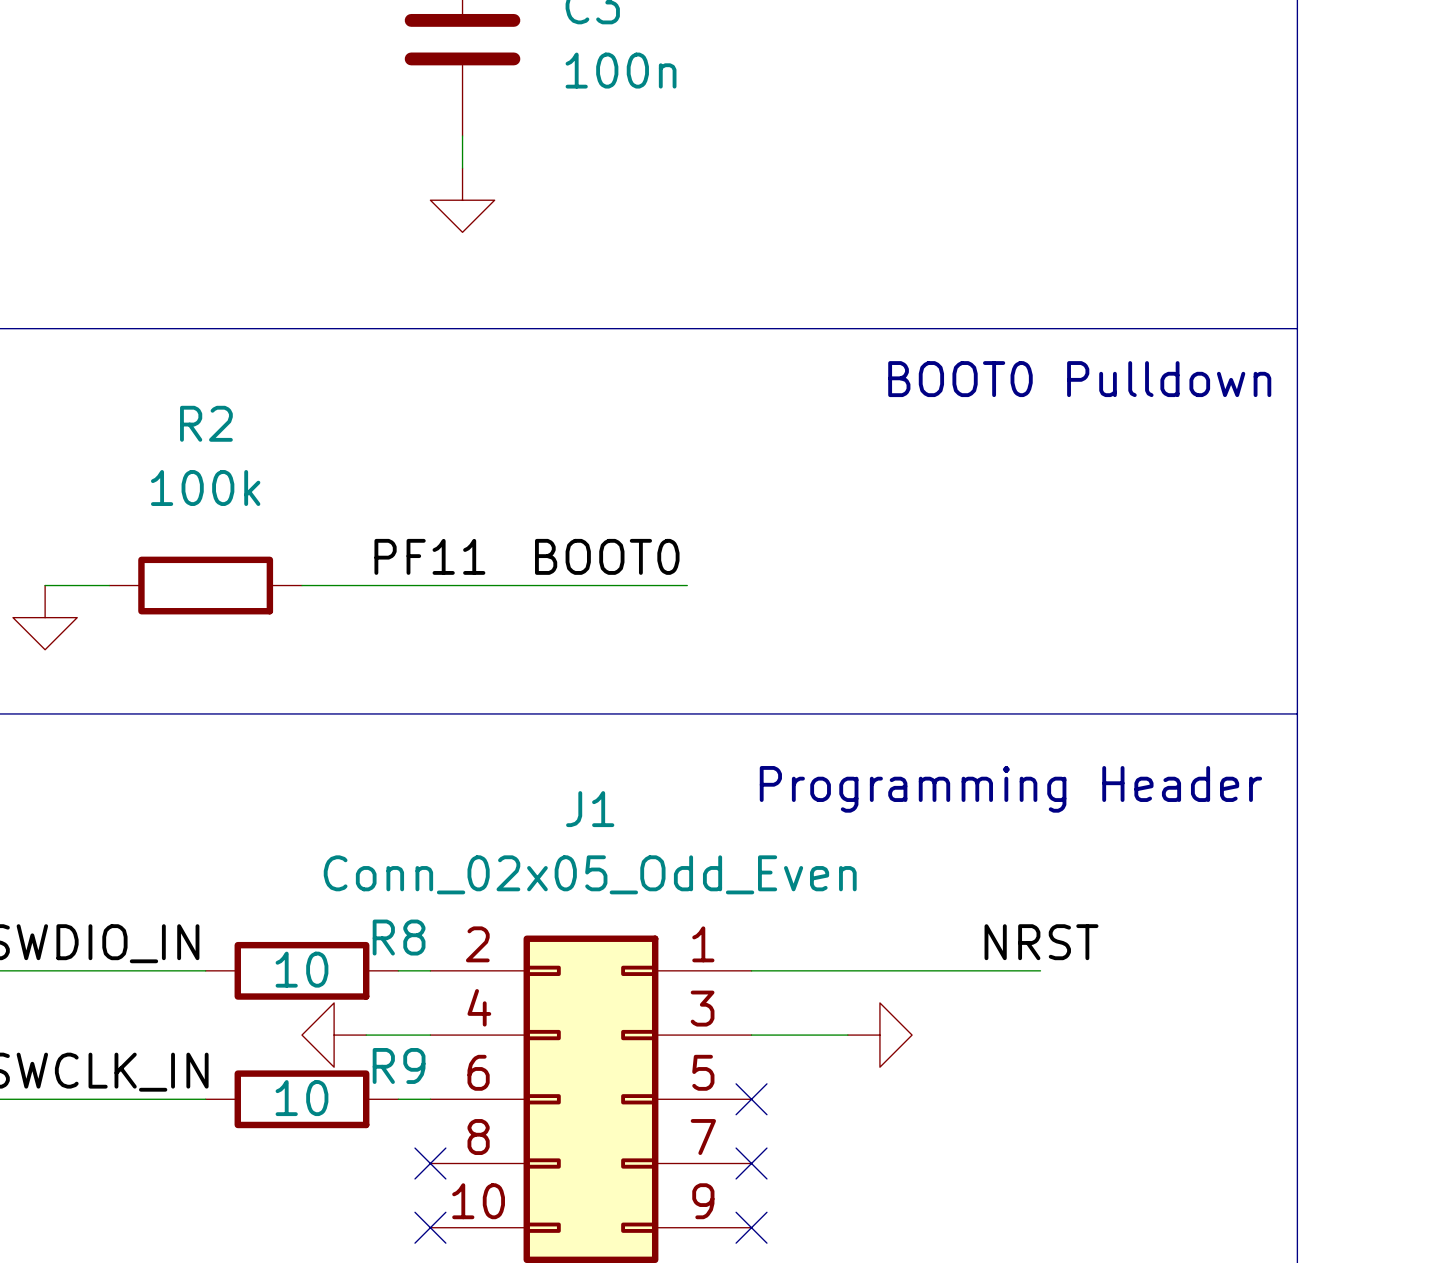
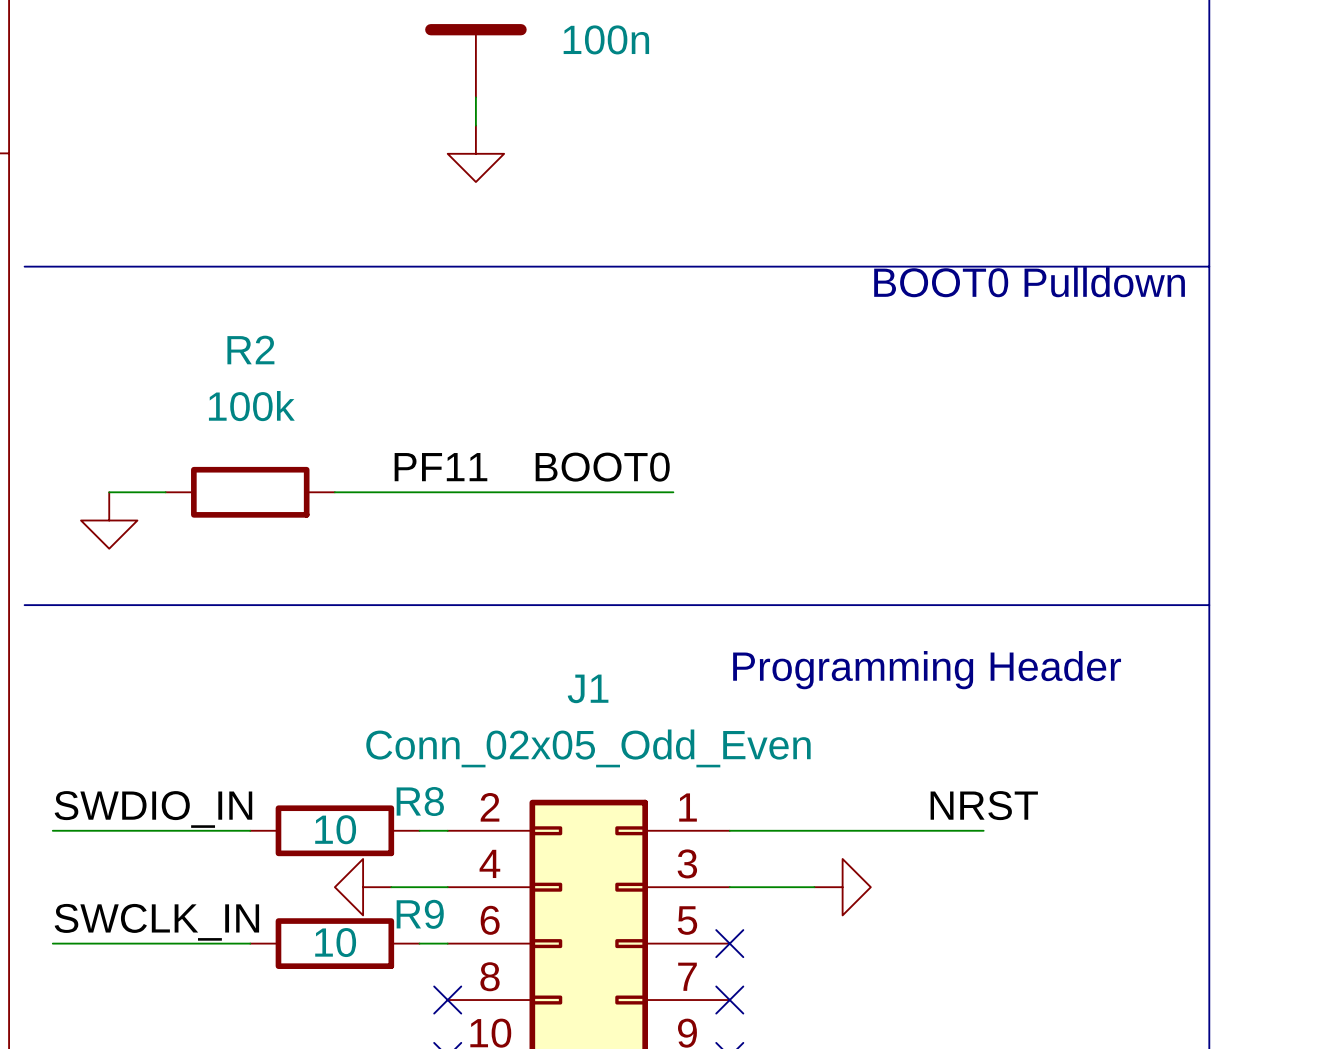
text position: BOOT0 Pulldown (1079, 379) -> BOOT0 Pulldown (1029, 282)

